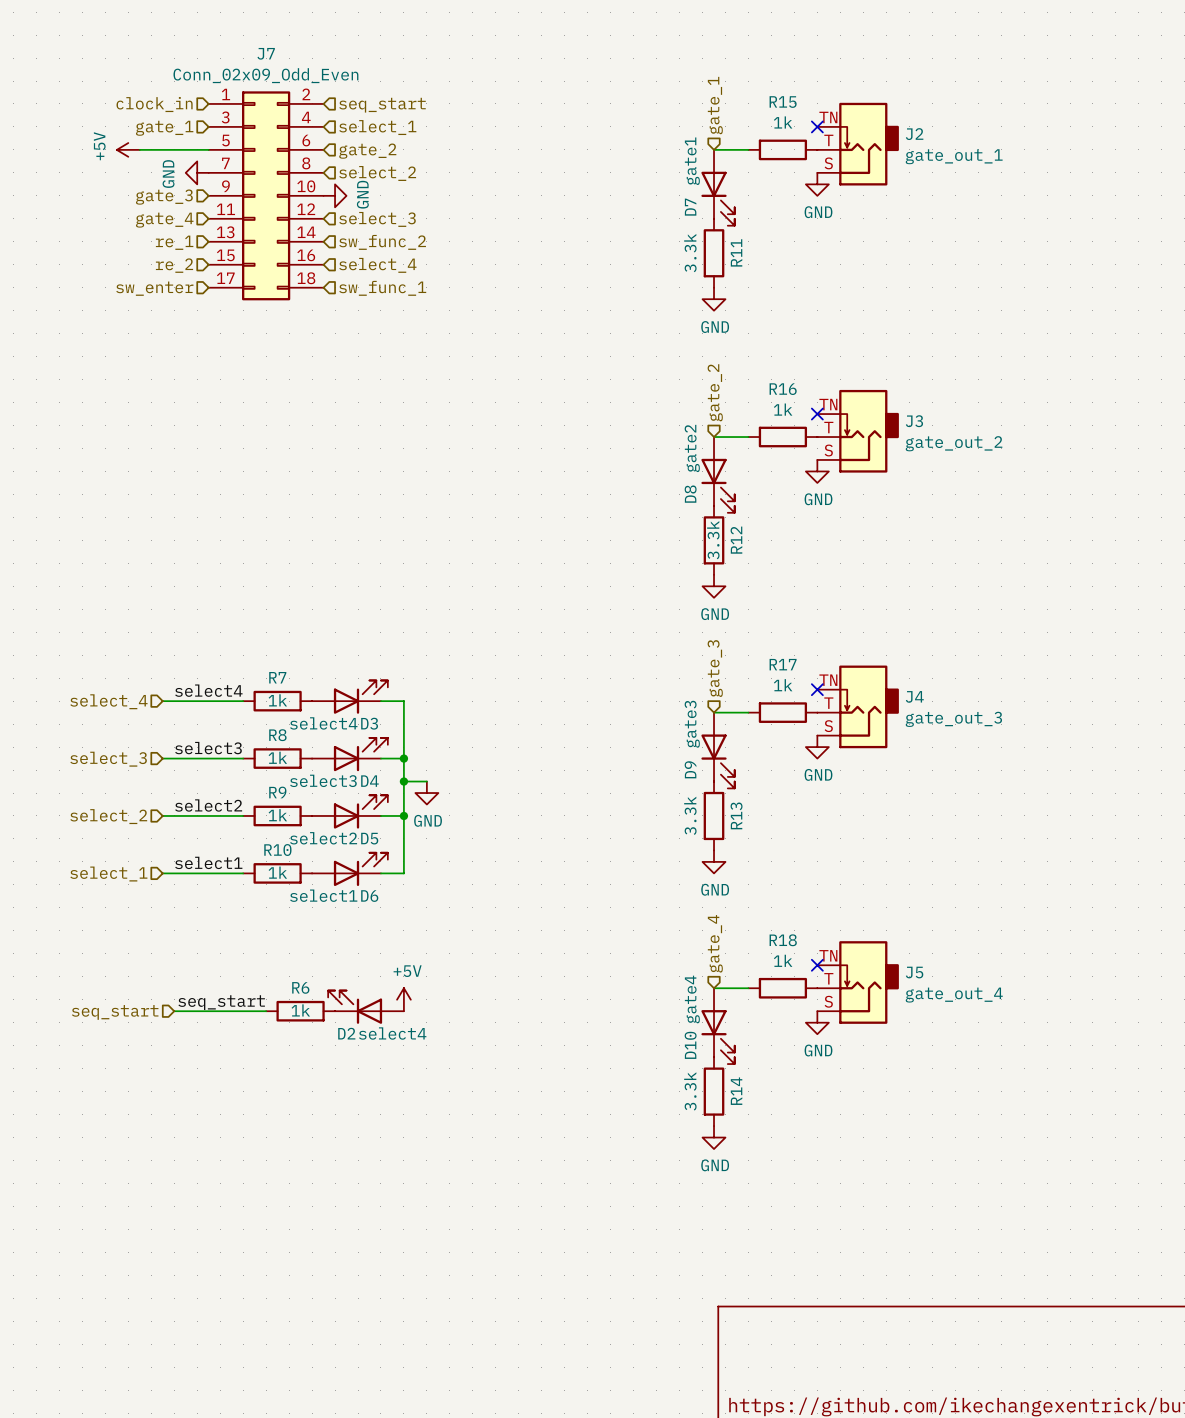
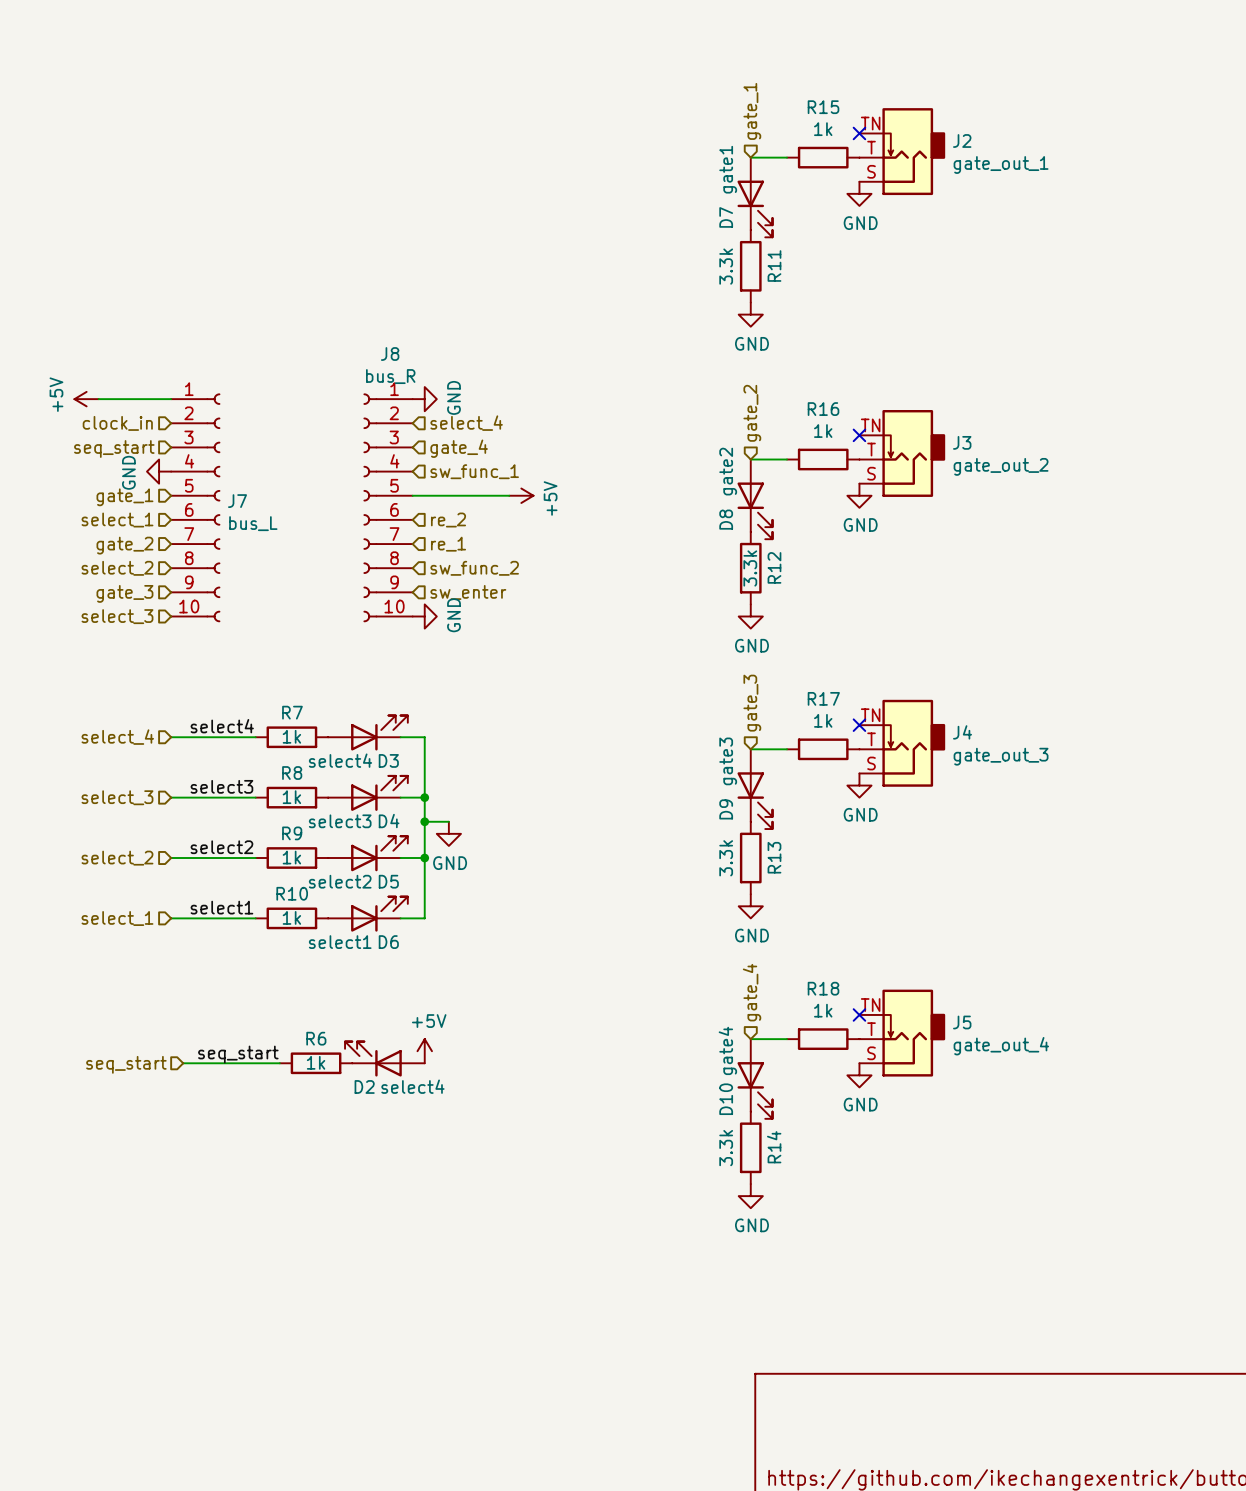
J7 name position: J7 (266, 53) -> J7 (237, 501)
J7 value: Conn_02x09_Odd_Even (265, 75) -> bus_L (253, 523)
J7 symbol: [208, 91, 324, 301] -> [171, 393, 221, 623]
hierarchical label: clock_in (154, 104) -> none
hierarchical label: seq_start (382, 105) -> none
hierarchical label: select_1 (377, 127) -> none
hierarchical label: gate_1 (164, 128) -> none
power symbol: +5V (128, 149) -> none
wire: (139, 149) (208, 149) -> none
hierarchical label: gate_2 (367, 151) -> none
power symbol: GND (197, 172) -> none
hierarchical label: select_2 (377, 173) -> none
power symbol: GND (335, 195) -> none
hierarchical label: gate_3 (164, 197) -> none
hierarchical label: select_3 (377, 219) -> none
hierarchical label: gate_4 (164, 220) -> none
hierarchical label: re_1 (174, 242) -> none
hierarchical label: sw_func_2 (382, 242) -> none
hierarchical label: re_2 (174, 265) -> none
hierarchical label position: select_4 (377, 265) -> select_4 (466, 423)
hierarchical label: sw_enter (154, 288) -> none
hierarchical label position: sw_func_1 (382, 288) -> sw_func_1 (474, 471)
power symbol: none -> +5V (86, 399)
wire: none -> (98, 399) (171, 399)
power symbol: none -> GND (424, 399)
hierarchical label: none -> clock_in (117, 423)
hierarchical label: none -> seq_start (114, 449)
hierarchical label: none -> gate_4 (459, 448)
power symbol: none -> GND (159, 471)
wire: none -> (412, 495) (509, 495)
power symbol: none -> +5V (521, 495)
hierarchical label: none -> gate_1 (124, 497)
J8: none -> bus_R (388, 507)
hierarchical label: none -> select_1 (117, 520)
hierarchical label: none -> re_2 (448, 520)
hierarchical label: none -> gate_2 (124, 545)
hierarchical label: none -> re_1 (448, 544)
hierarchical label: none -> select_2 (117, 568)
hierarchical label: none -> sw_func_2 (474, 568)
hierarchical label: none -> gate_3 (124, 593)
hierarchical label: none -> sw_enter (468, 592)
hierarchical label: none -> select_3 (117, 616)
power symbol: none -> GND (424, 616)

